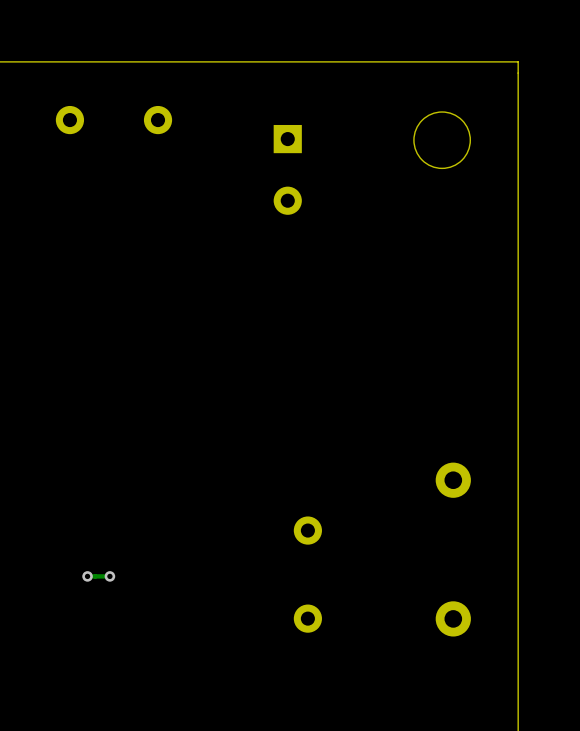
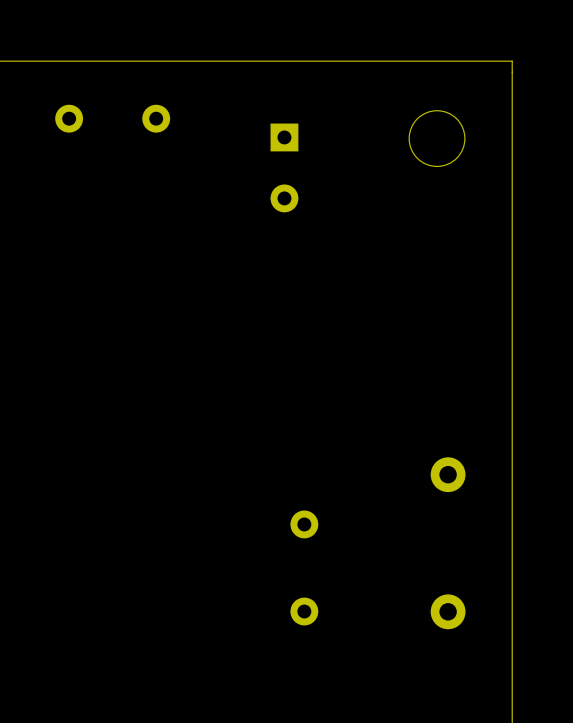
via: (87, 576) -> none
track: (109, 576) (87, 576) -> none
via: (109, 576) -> none

